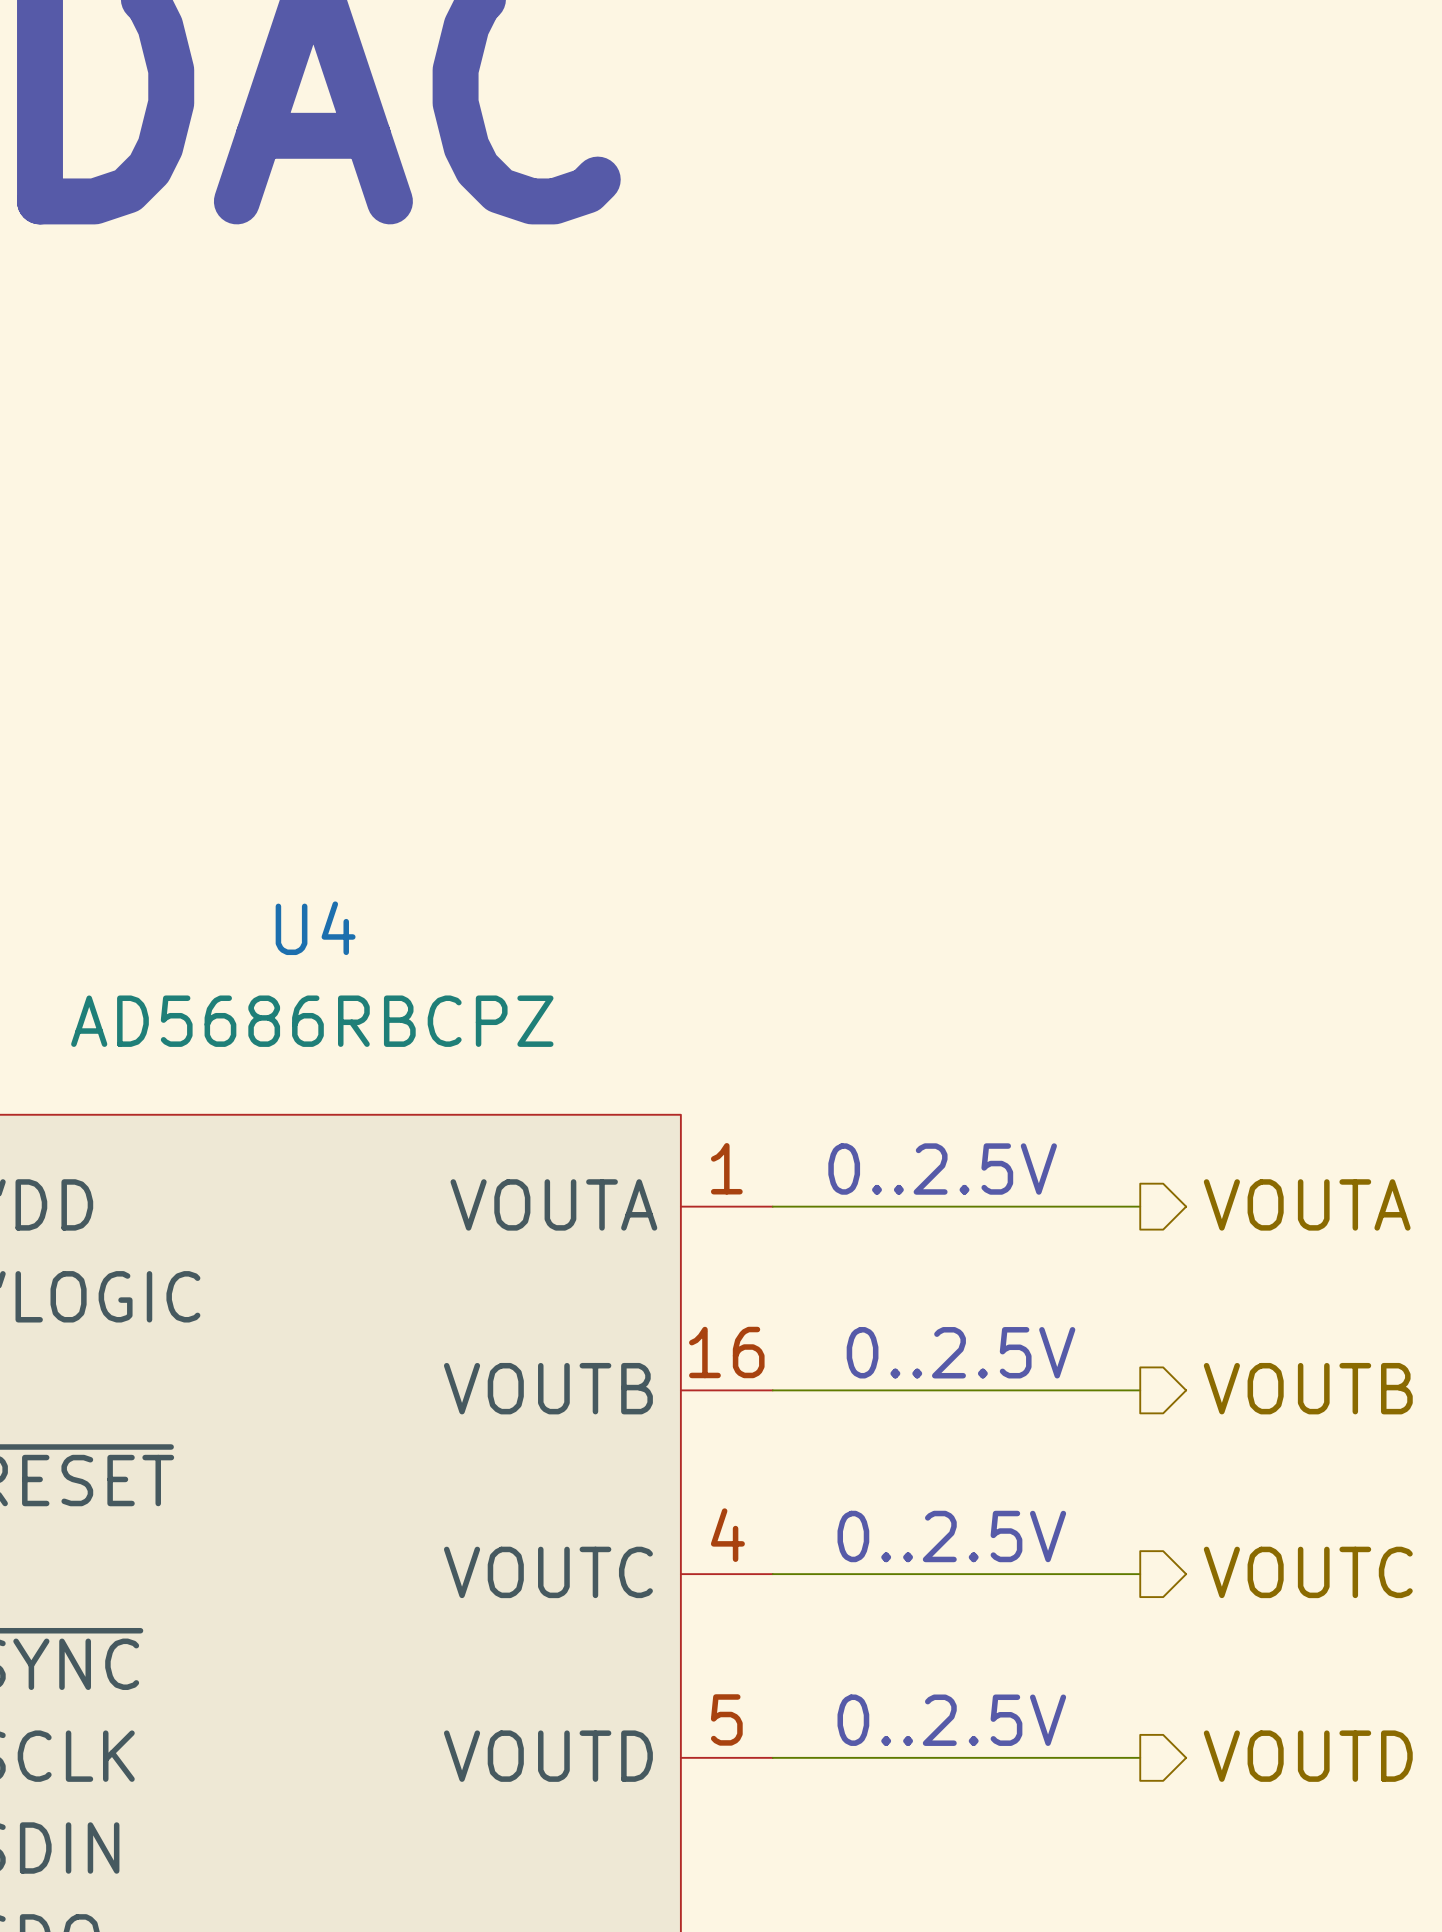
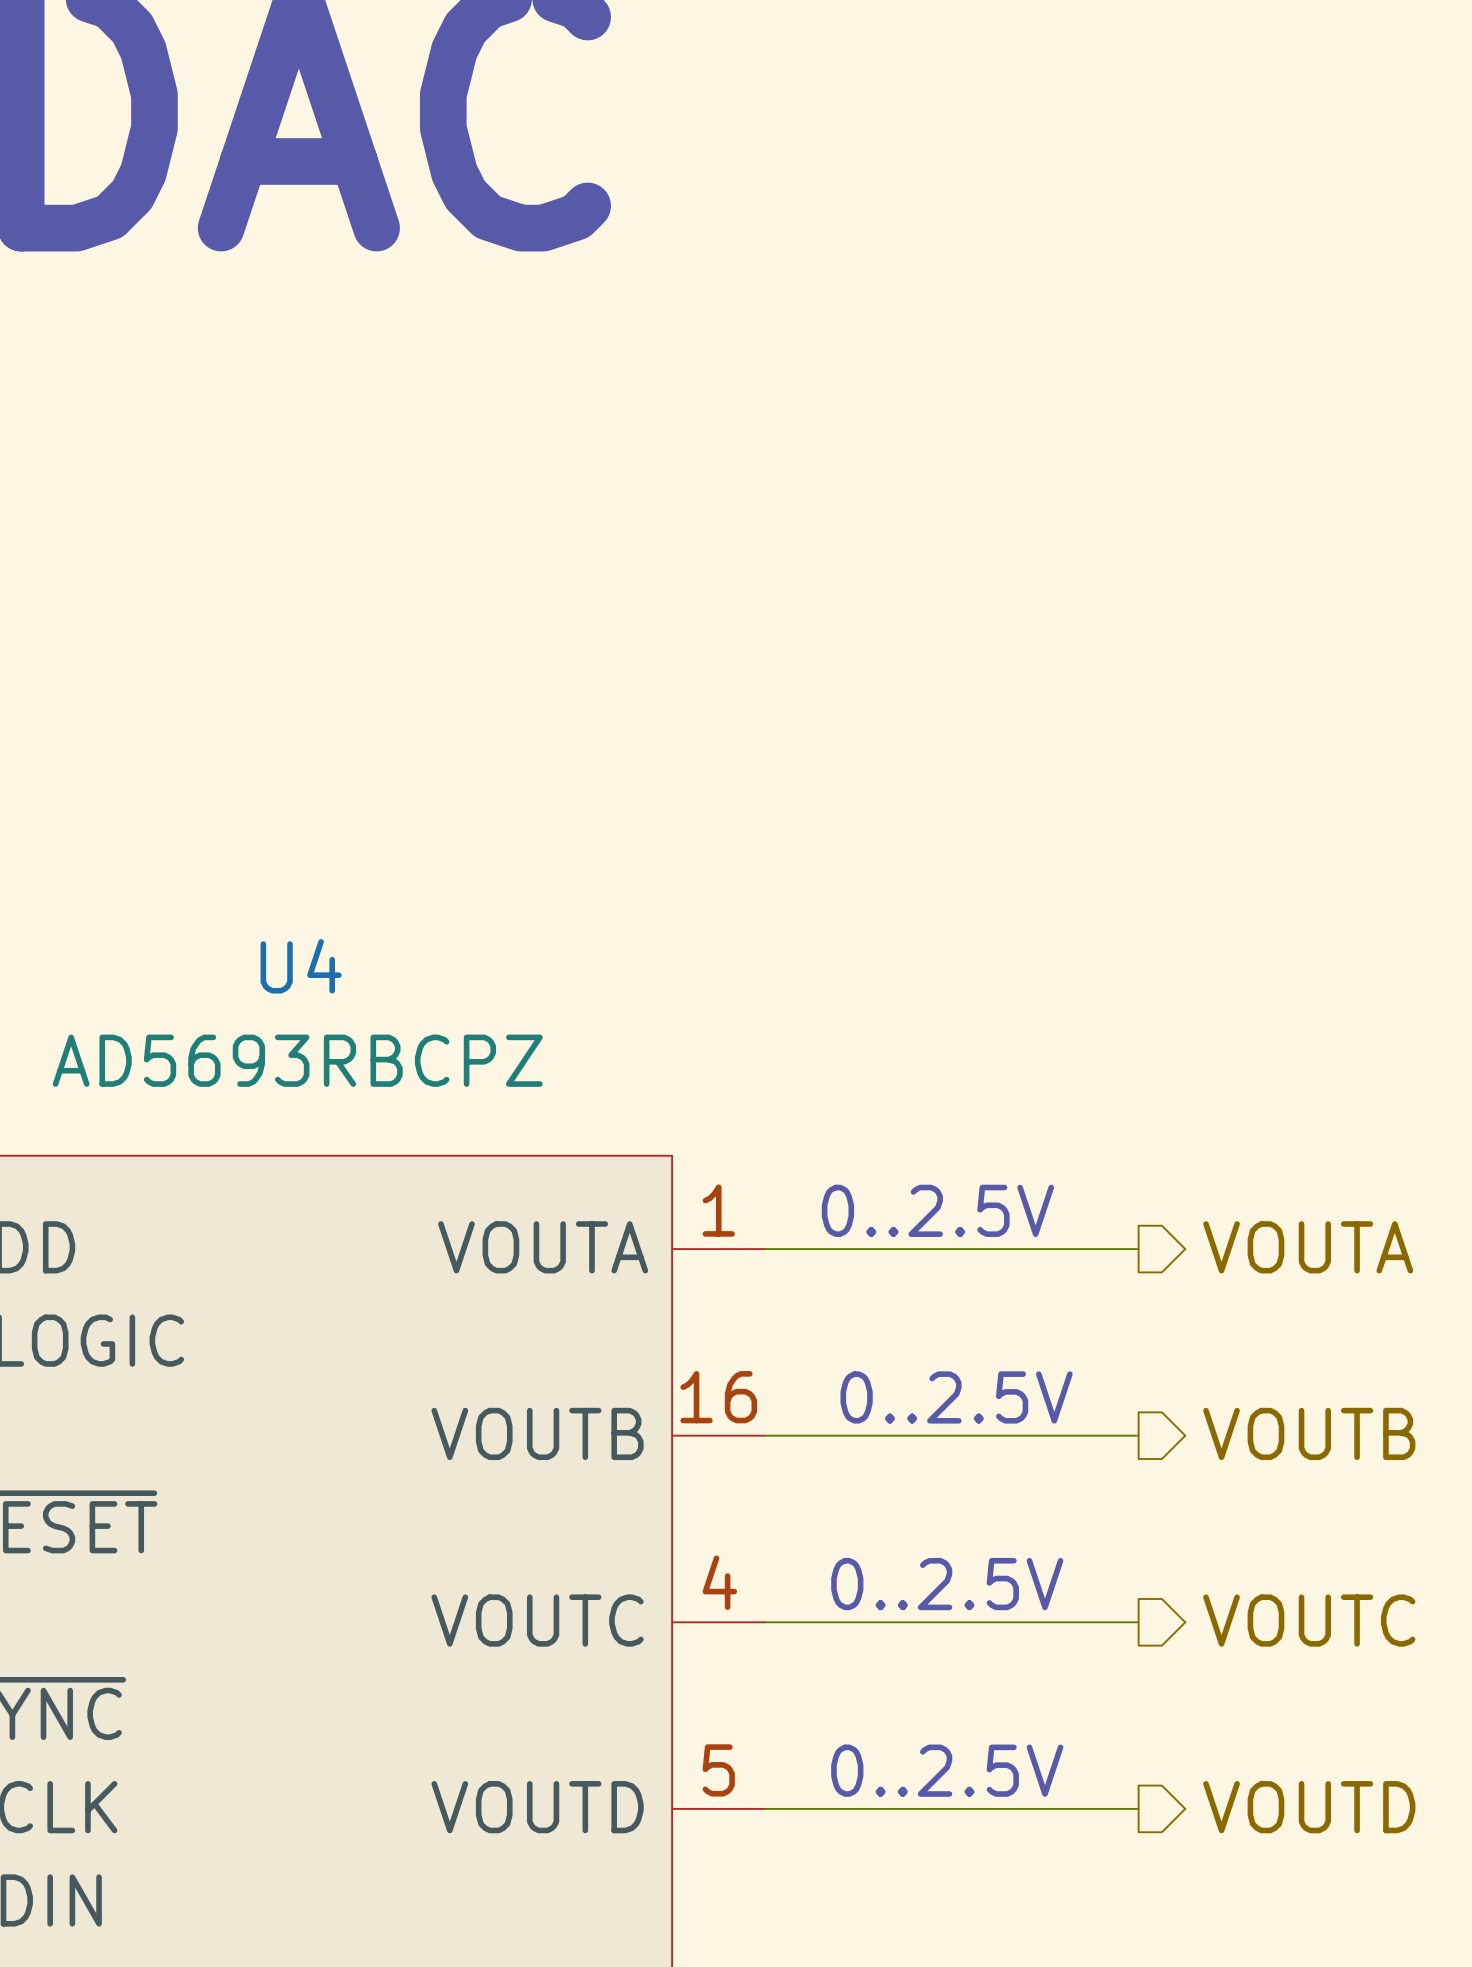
U4 value: AD5686RBCPZ (312, 1021) -> AD5693RBCPZ (297, 1060)

